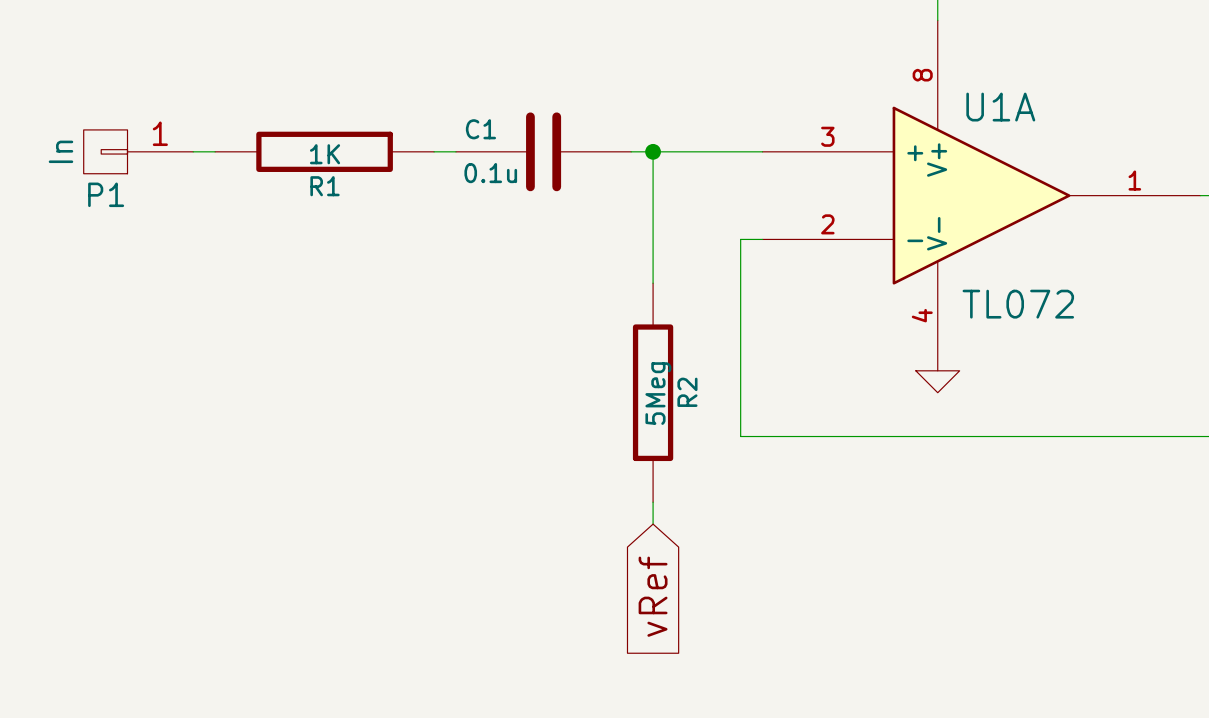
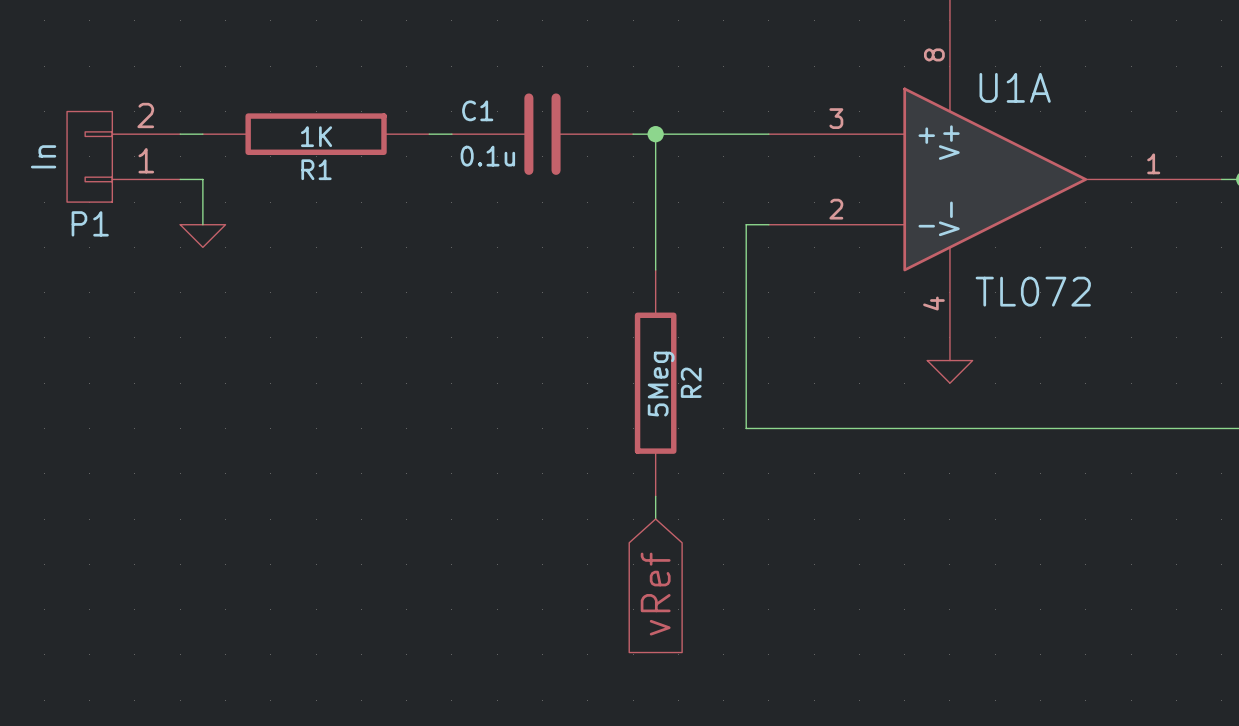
P1 symbol: [83, 129, 194, 174] -> [67, 111, 181, 203]
wire: none -> (180, 179) (202, 179) (202, 224)
power symbol: none -> (202, 236)

